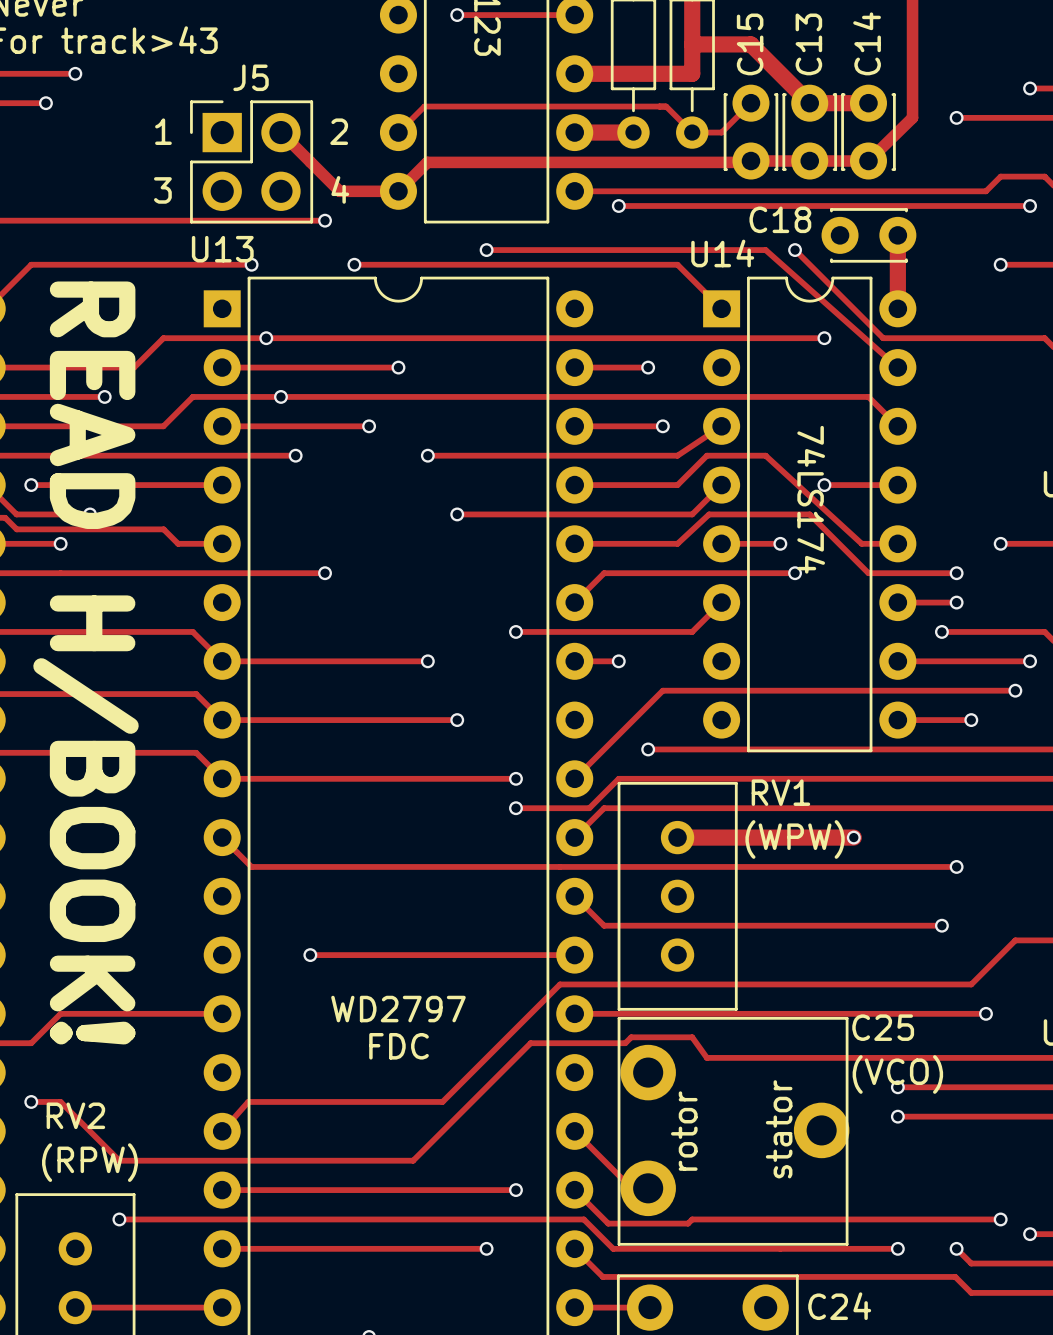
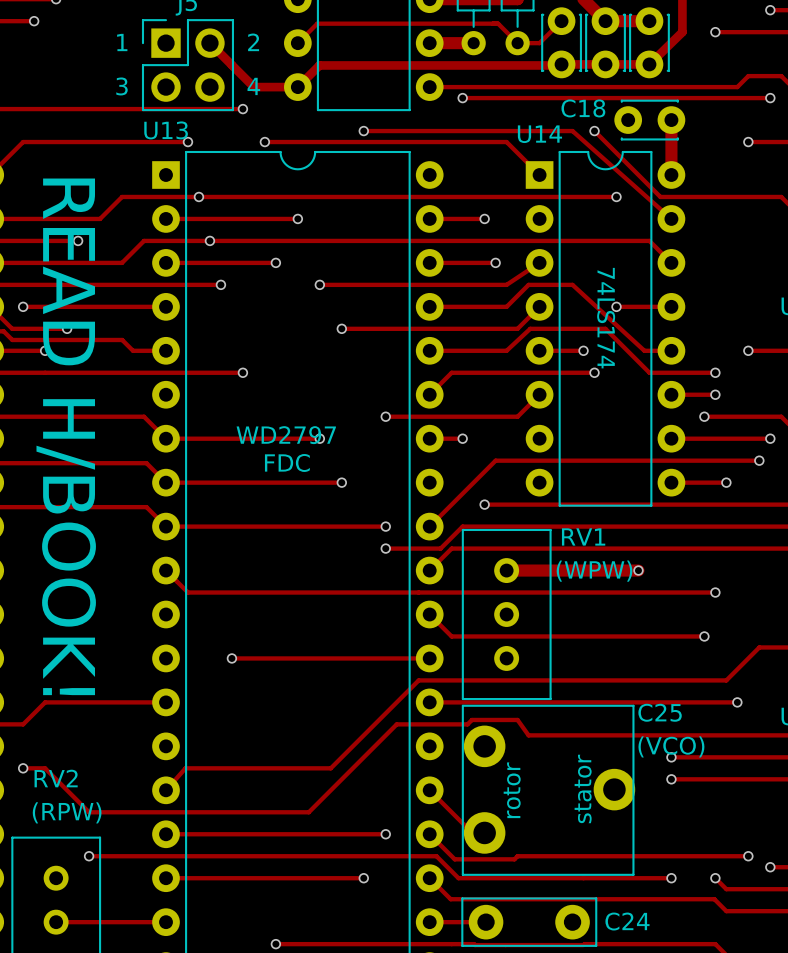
text position: WD2797 (398, 1009) -> WD2797 (286, 435)
text position: FDC (399, 1046) -> FDC (287, 462)

